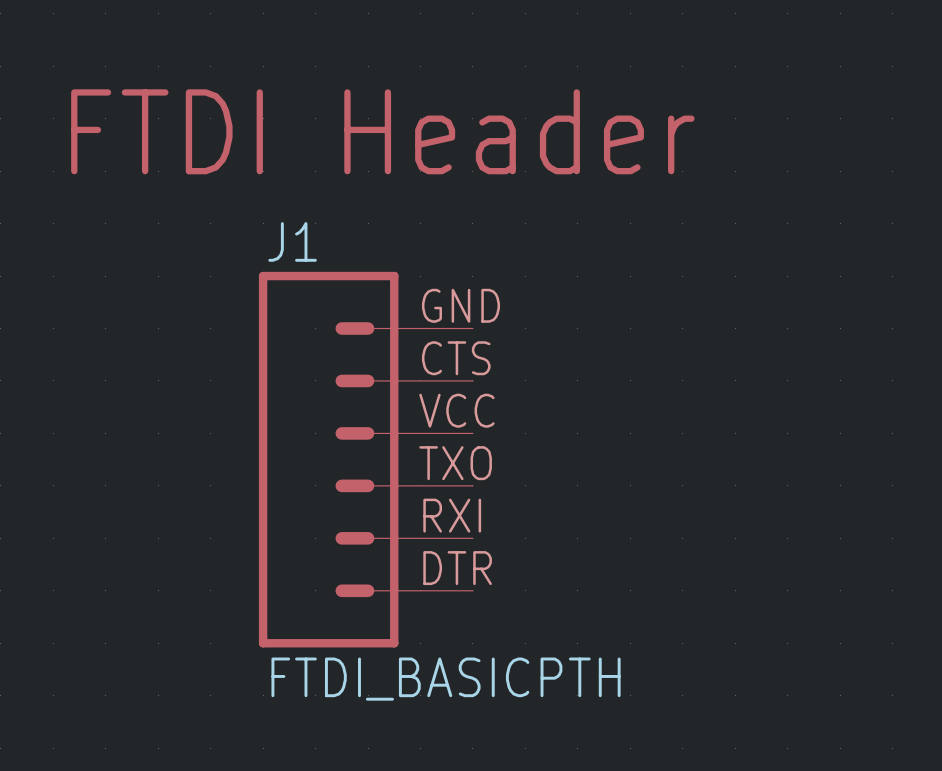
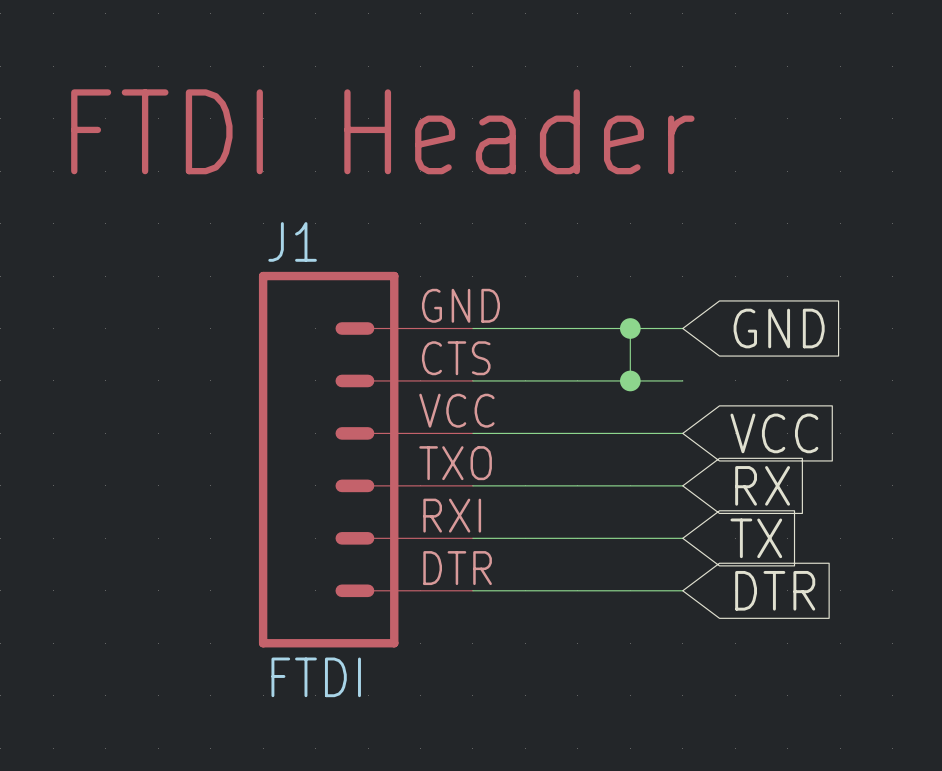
wire: none -> (472, 328) (682, 328)
wire: none -> (630, 328) (630, 380)
junction: none -> (630, 328)
global label: none -> GND (779, 328)
wire: none -> (472, 380) (682, 380)
junction: none -> (630, 380)
wire: none -> (472, 433) (682, 433)
global label: none -> VCC (774, 433)
wire: none -> (472, 485) (682, 485)
global label: none -> RX (762, 485)
wire: none -> (472, 538) (682, 538)
global label: none -> TX (756, 538)
wire: none -> (472, 590) (682, 590)
global label: none -> DTR (775, 590)
J1 value: FTDI_BASICPTH (446, 679) -> FTDI (316, 677)

